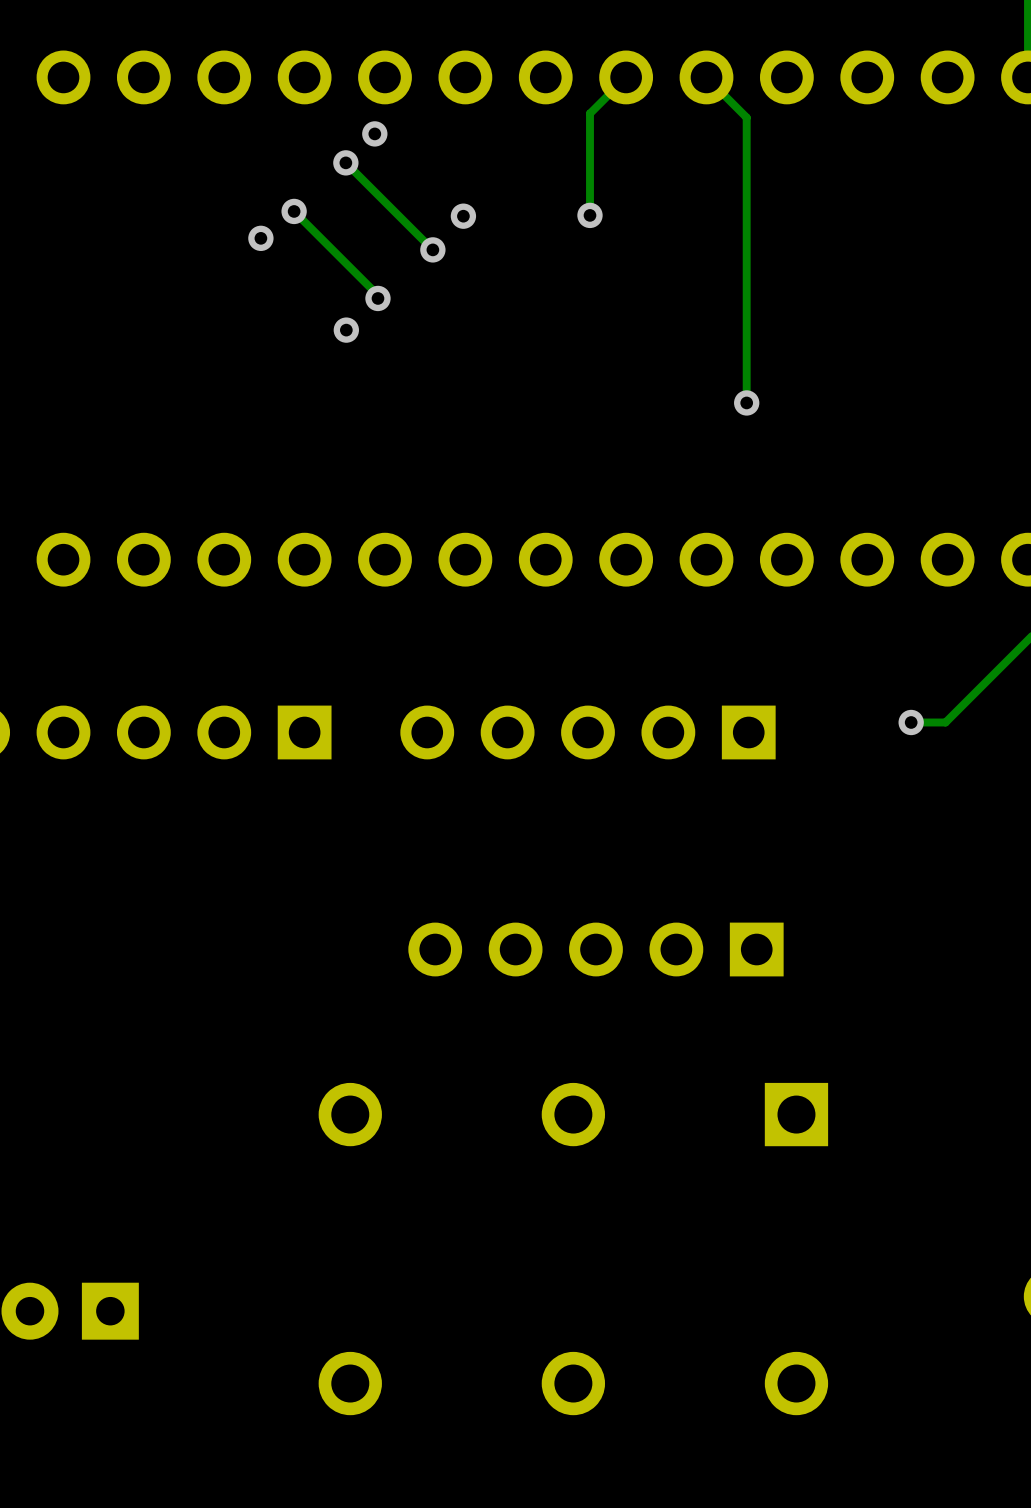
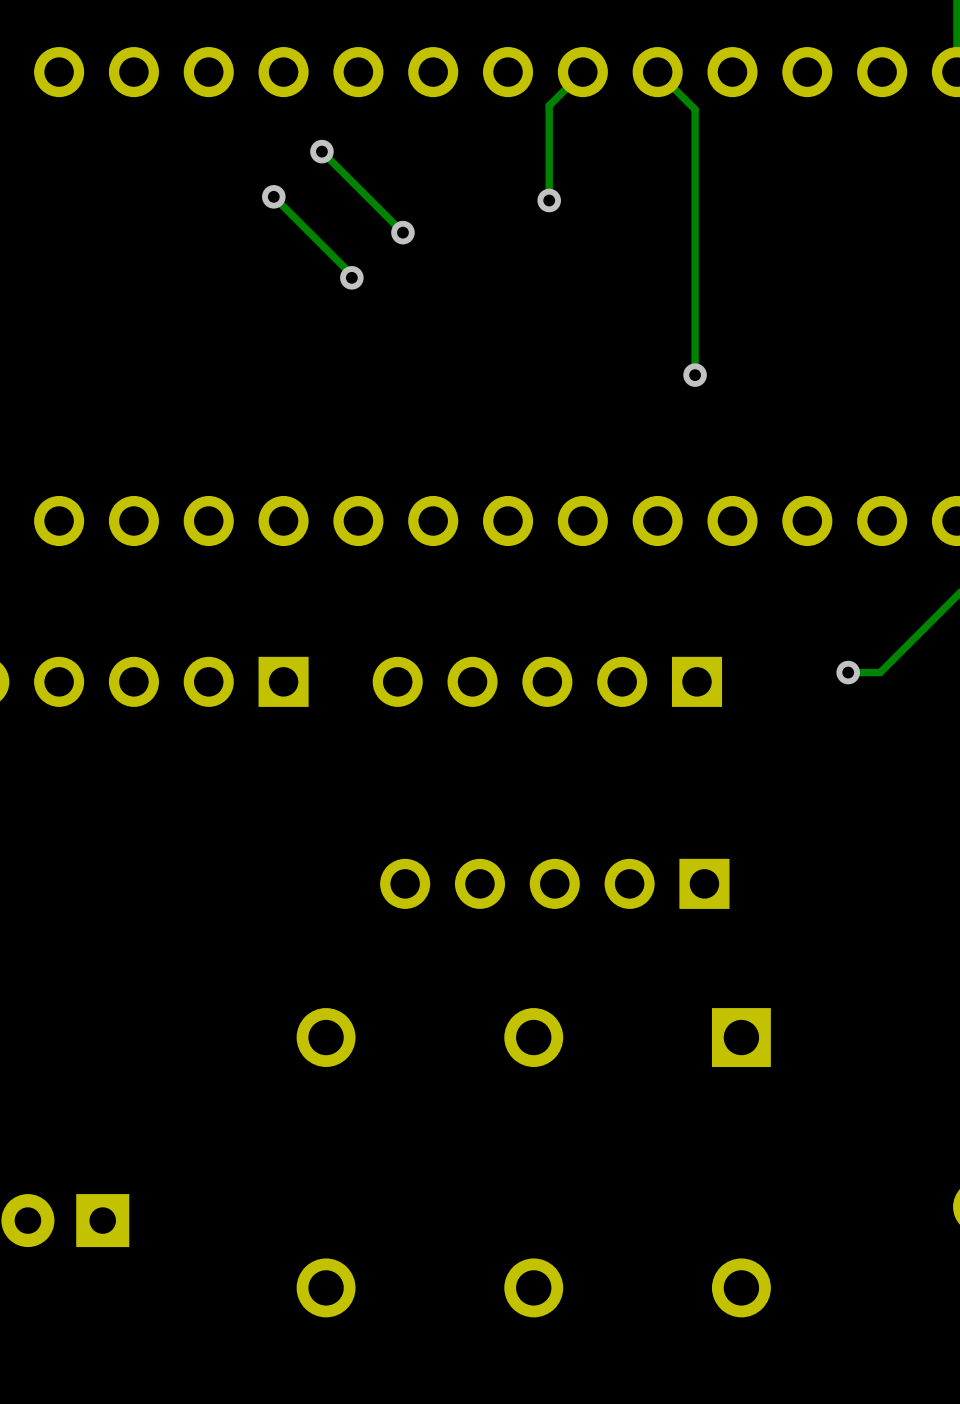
via: (374, 133) -> none
via: (463, 216) -> none
via: (260, 238) -> none
via: (346, 330) -> none

